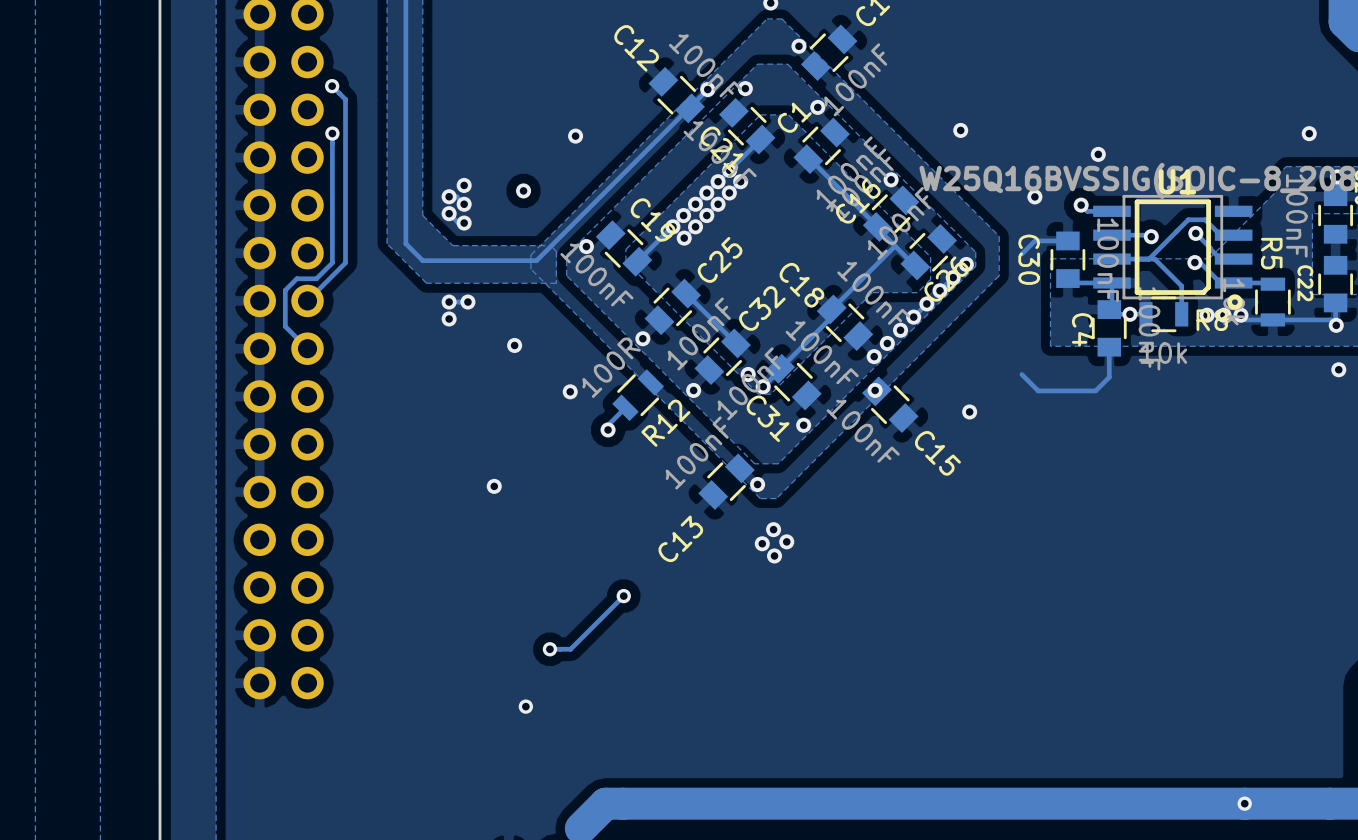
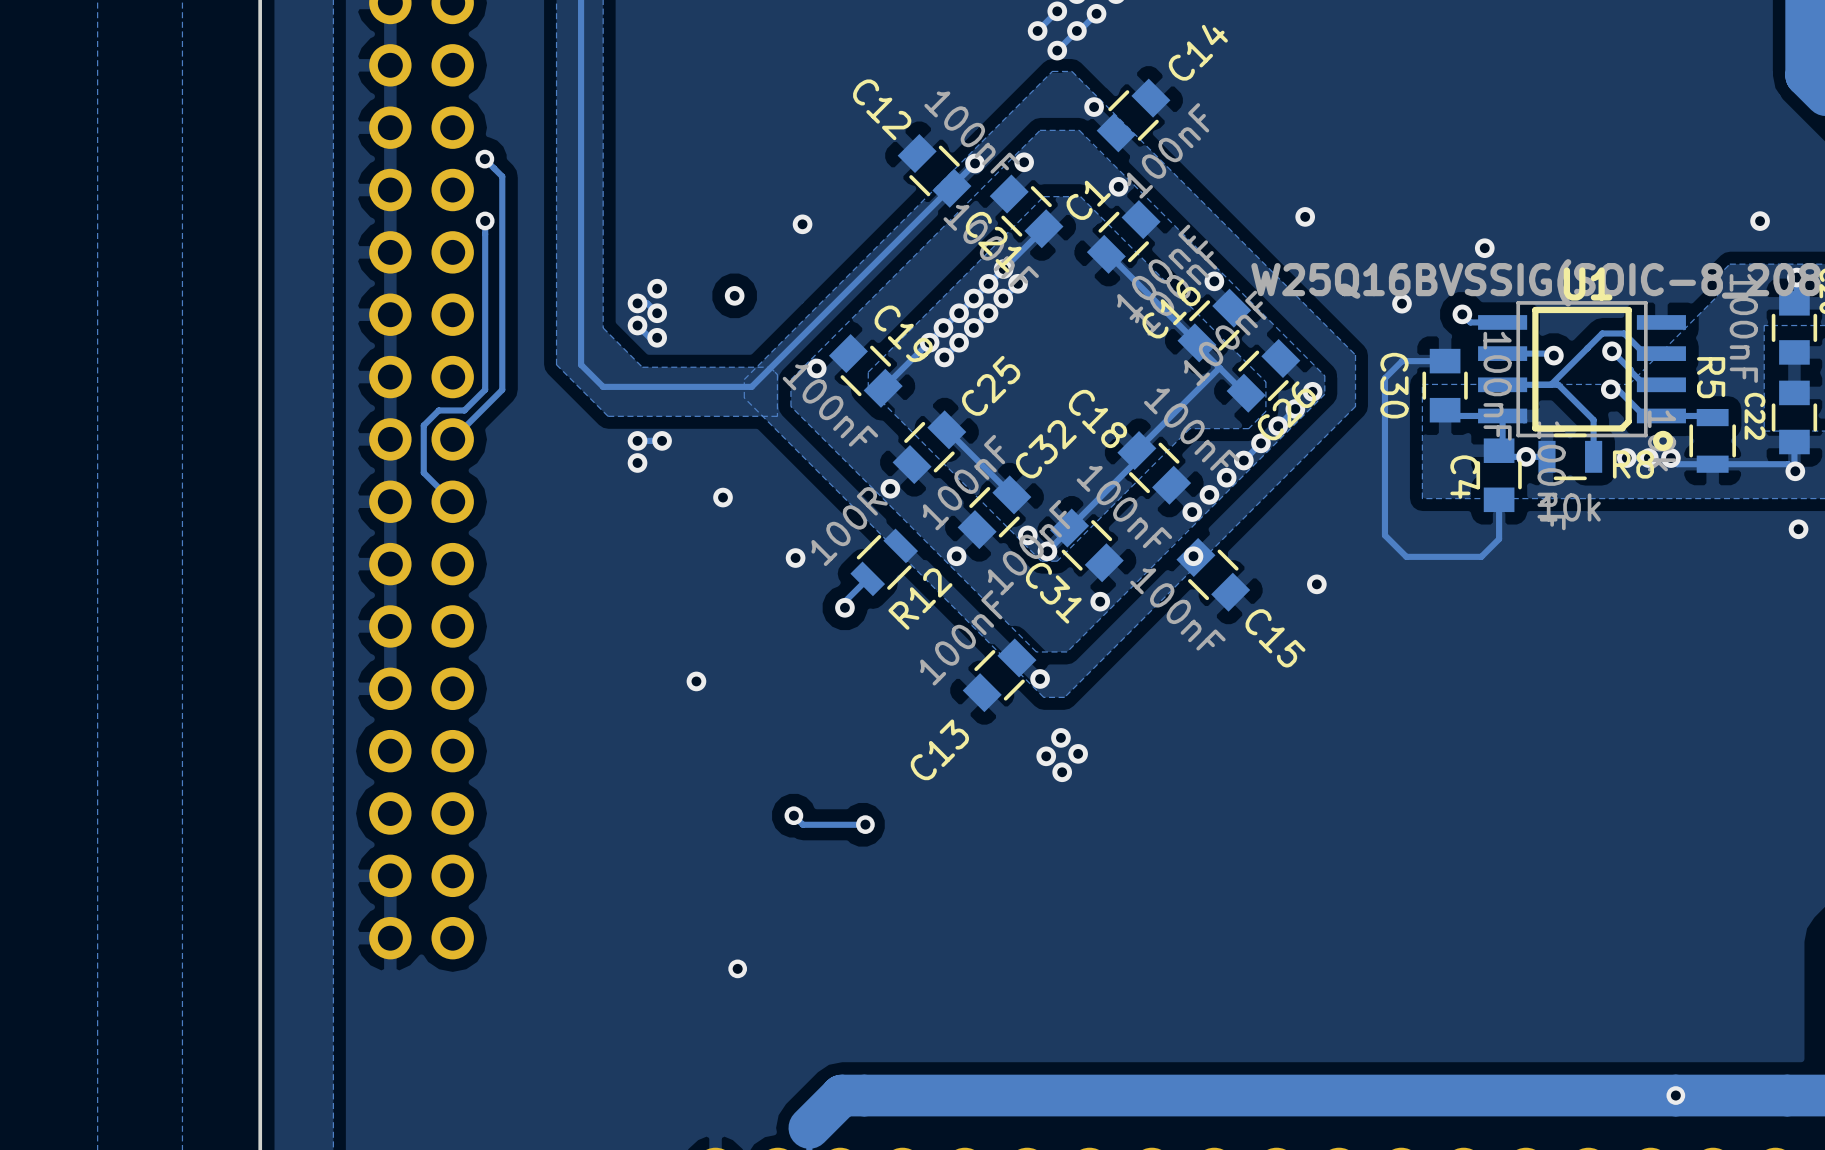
track: none -> (1384, 378) (1384, 535)
track: none -> (793, 815) (802, 824) (862, 824)
track: (623, 596) (570, 649) (549, 649) -> none
via position: (549, 649) -> (793, 815)

